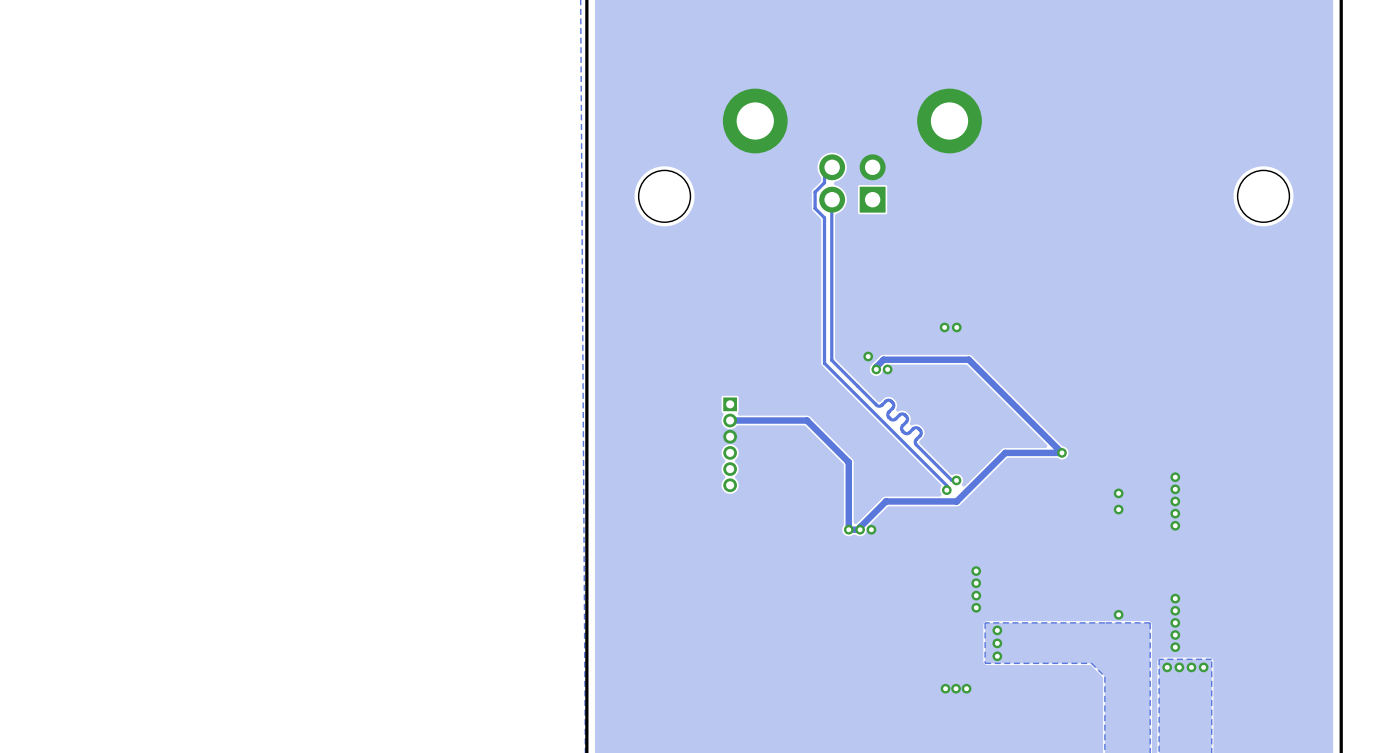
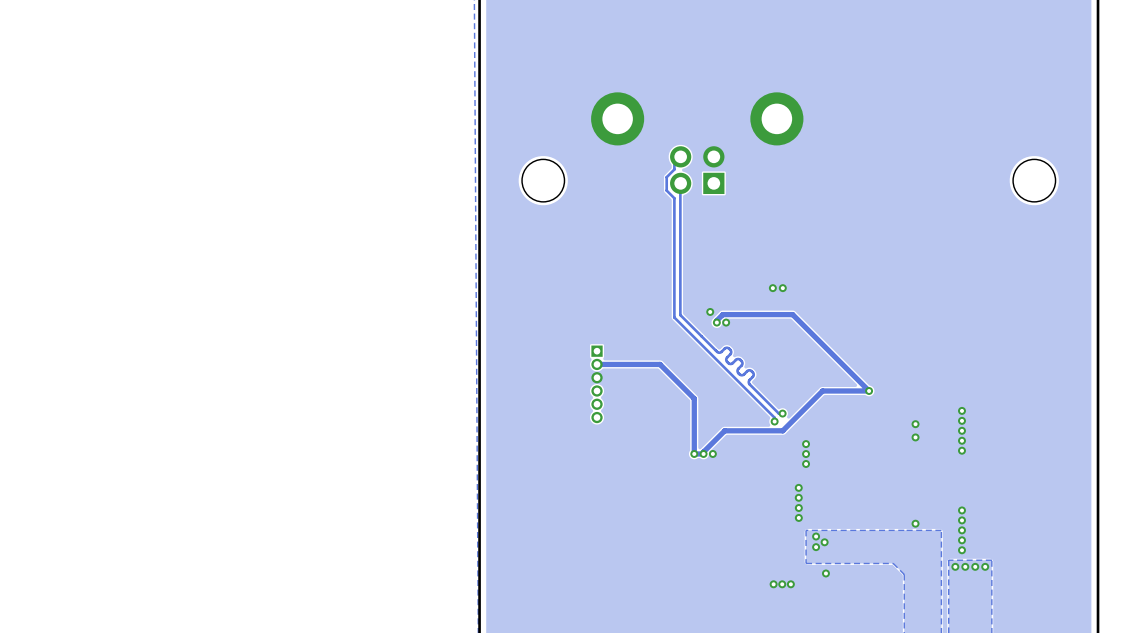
via: none -> (806, 444)
via: none -> (806, 454)
via: none -> (806, 463)
via: none -> (824, 542)
via: (997, 656) -> none
via: none -> (825, 573)

